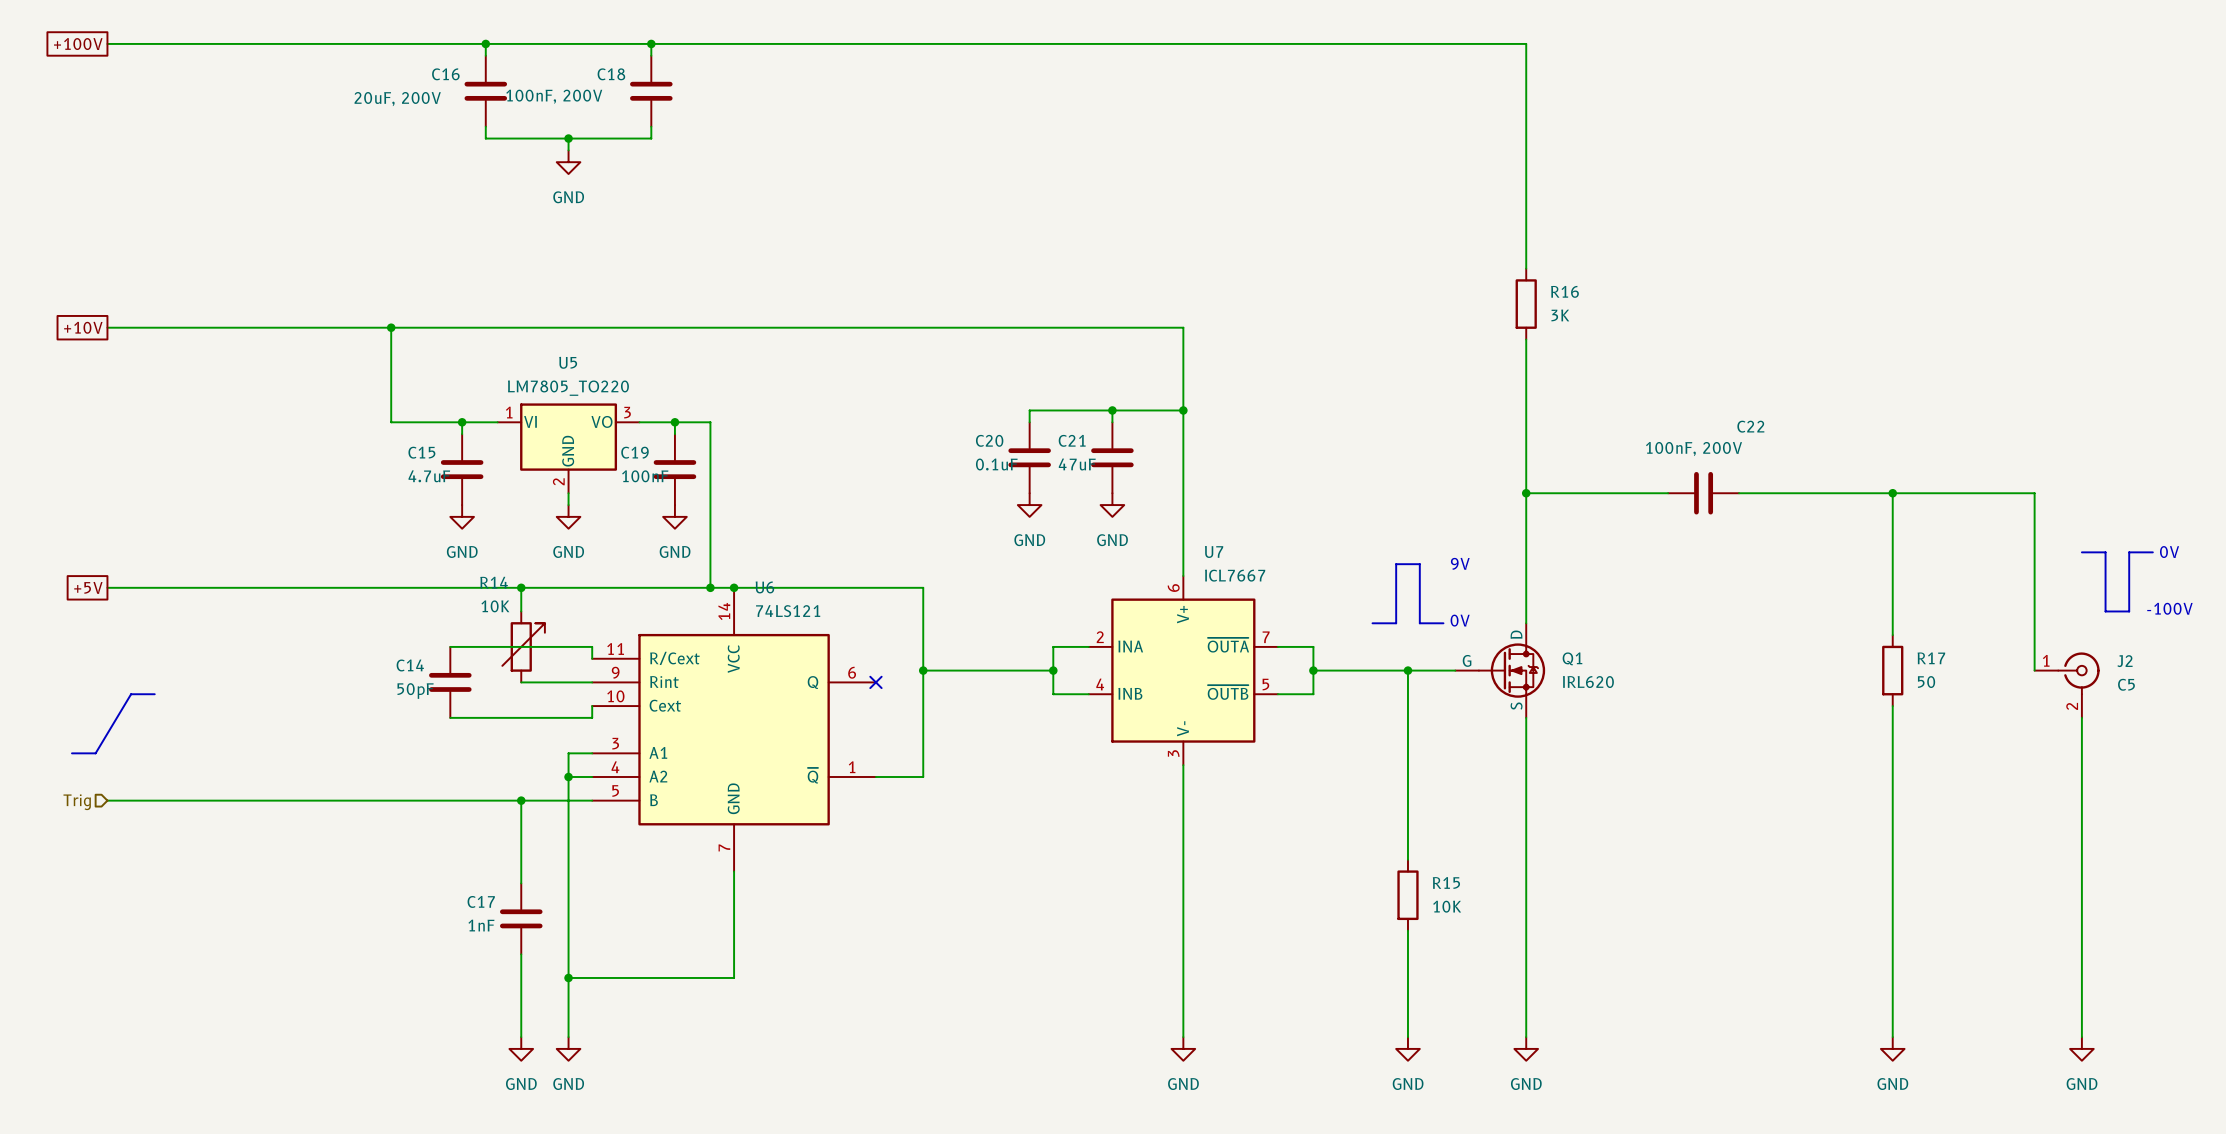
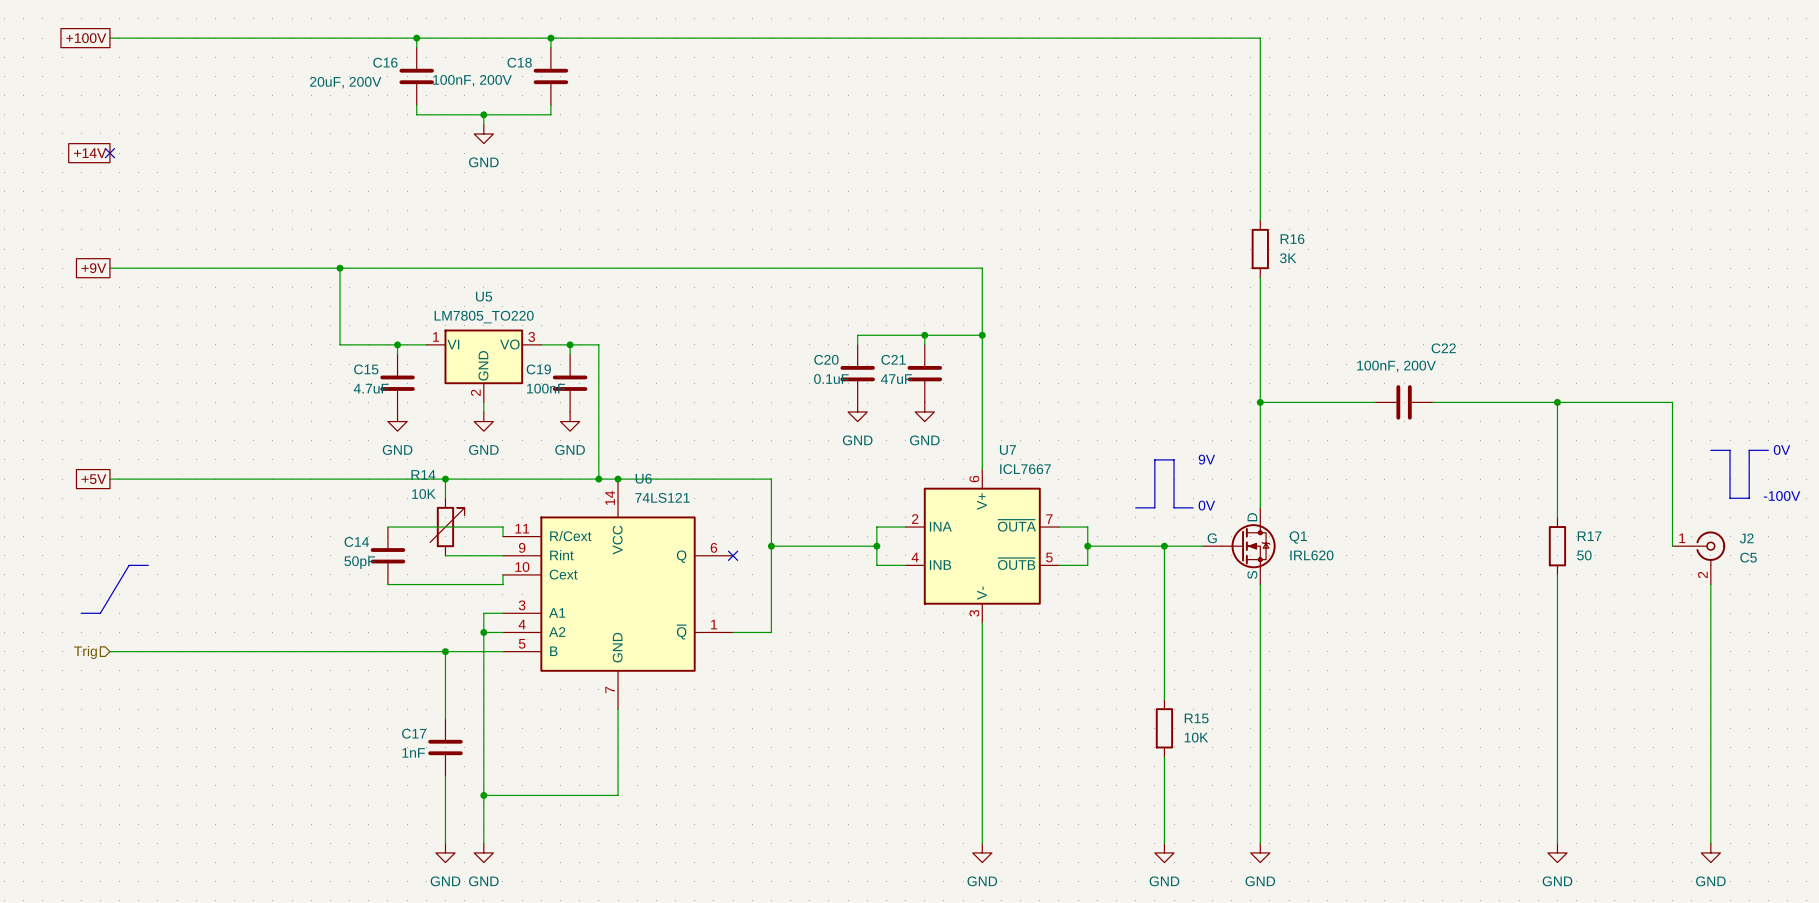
global label: none -> +14V (90, 153)
no-connect mark: none -> (109, 153)
global label: +10V (83, 327) -> +9V (94, 268)

